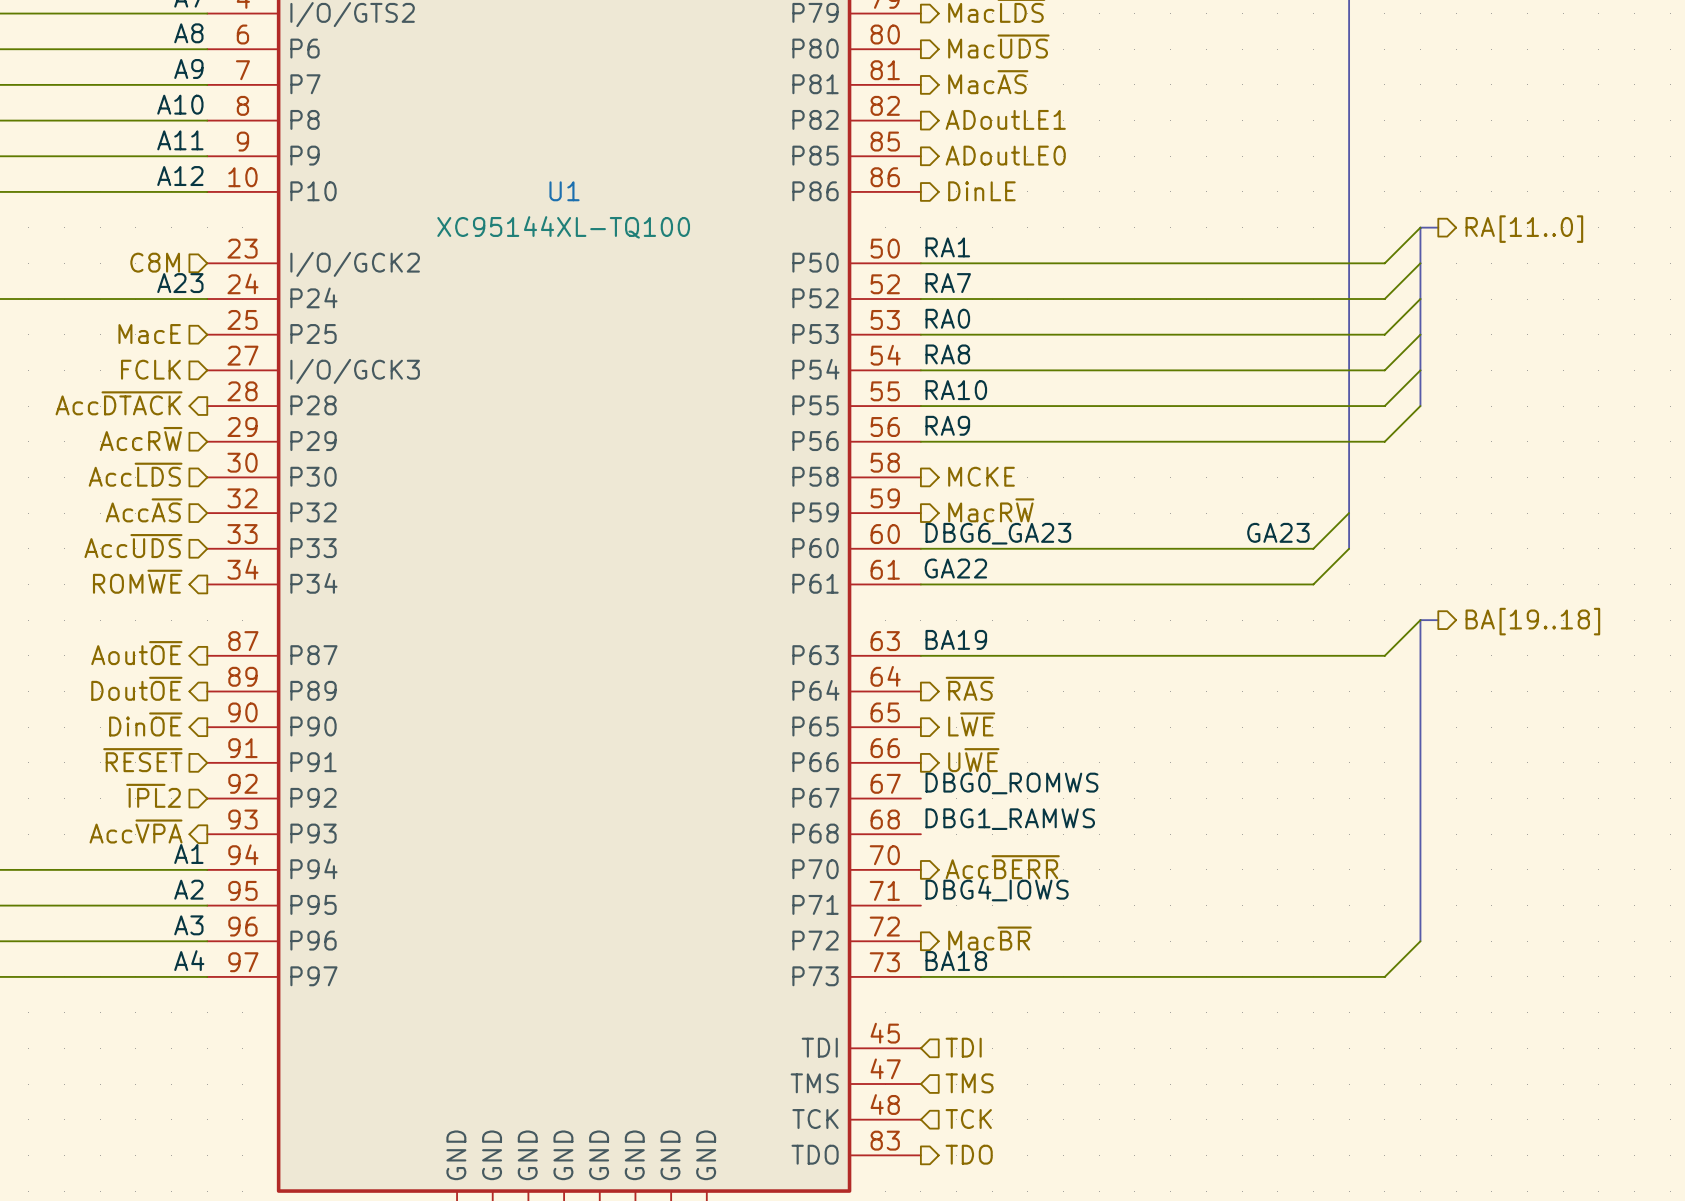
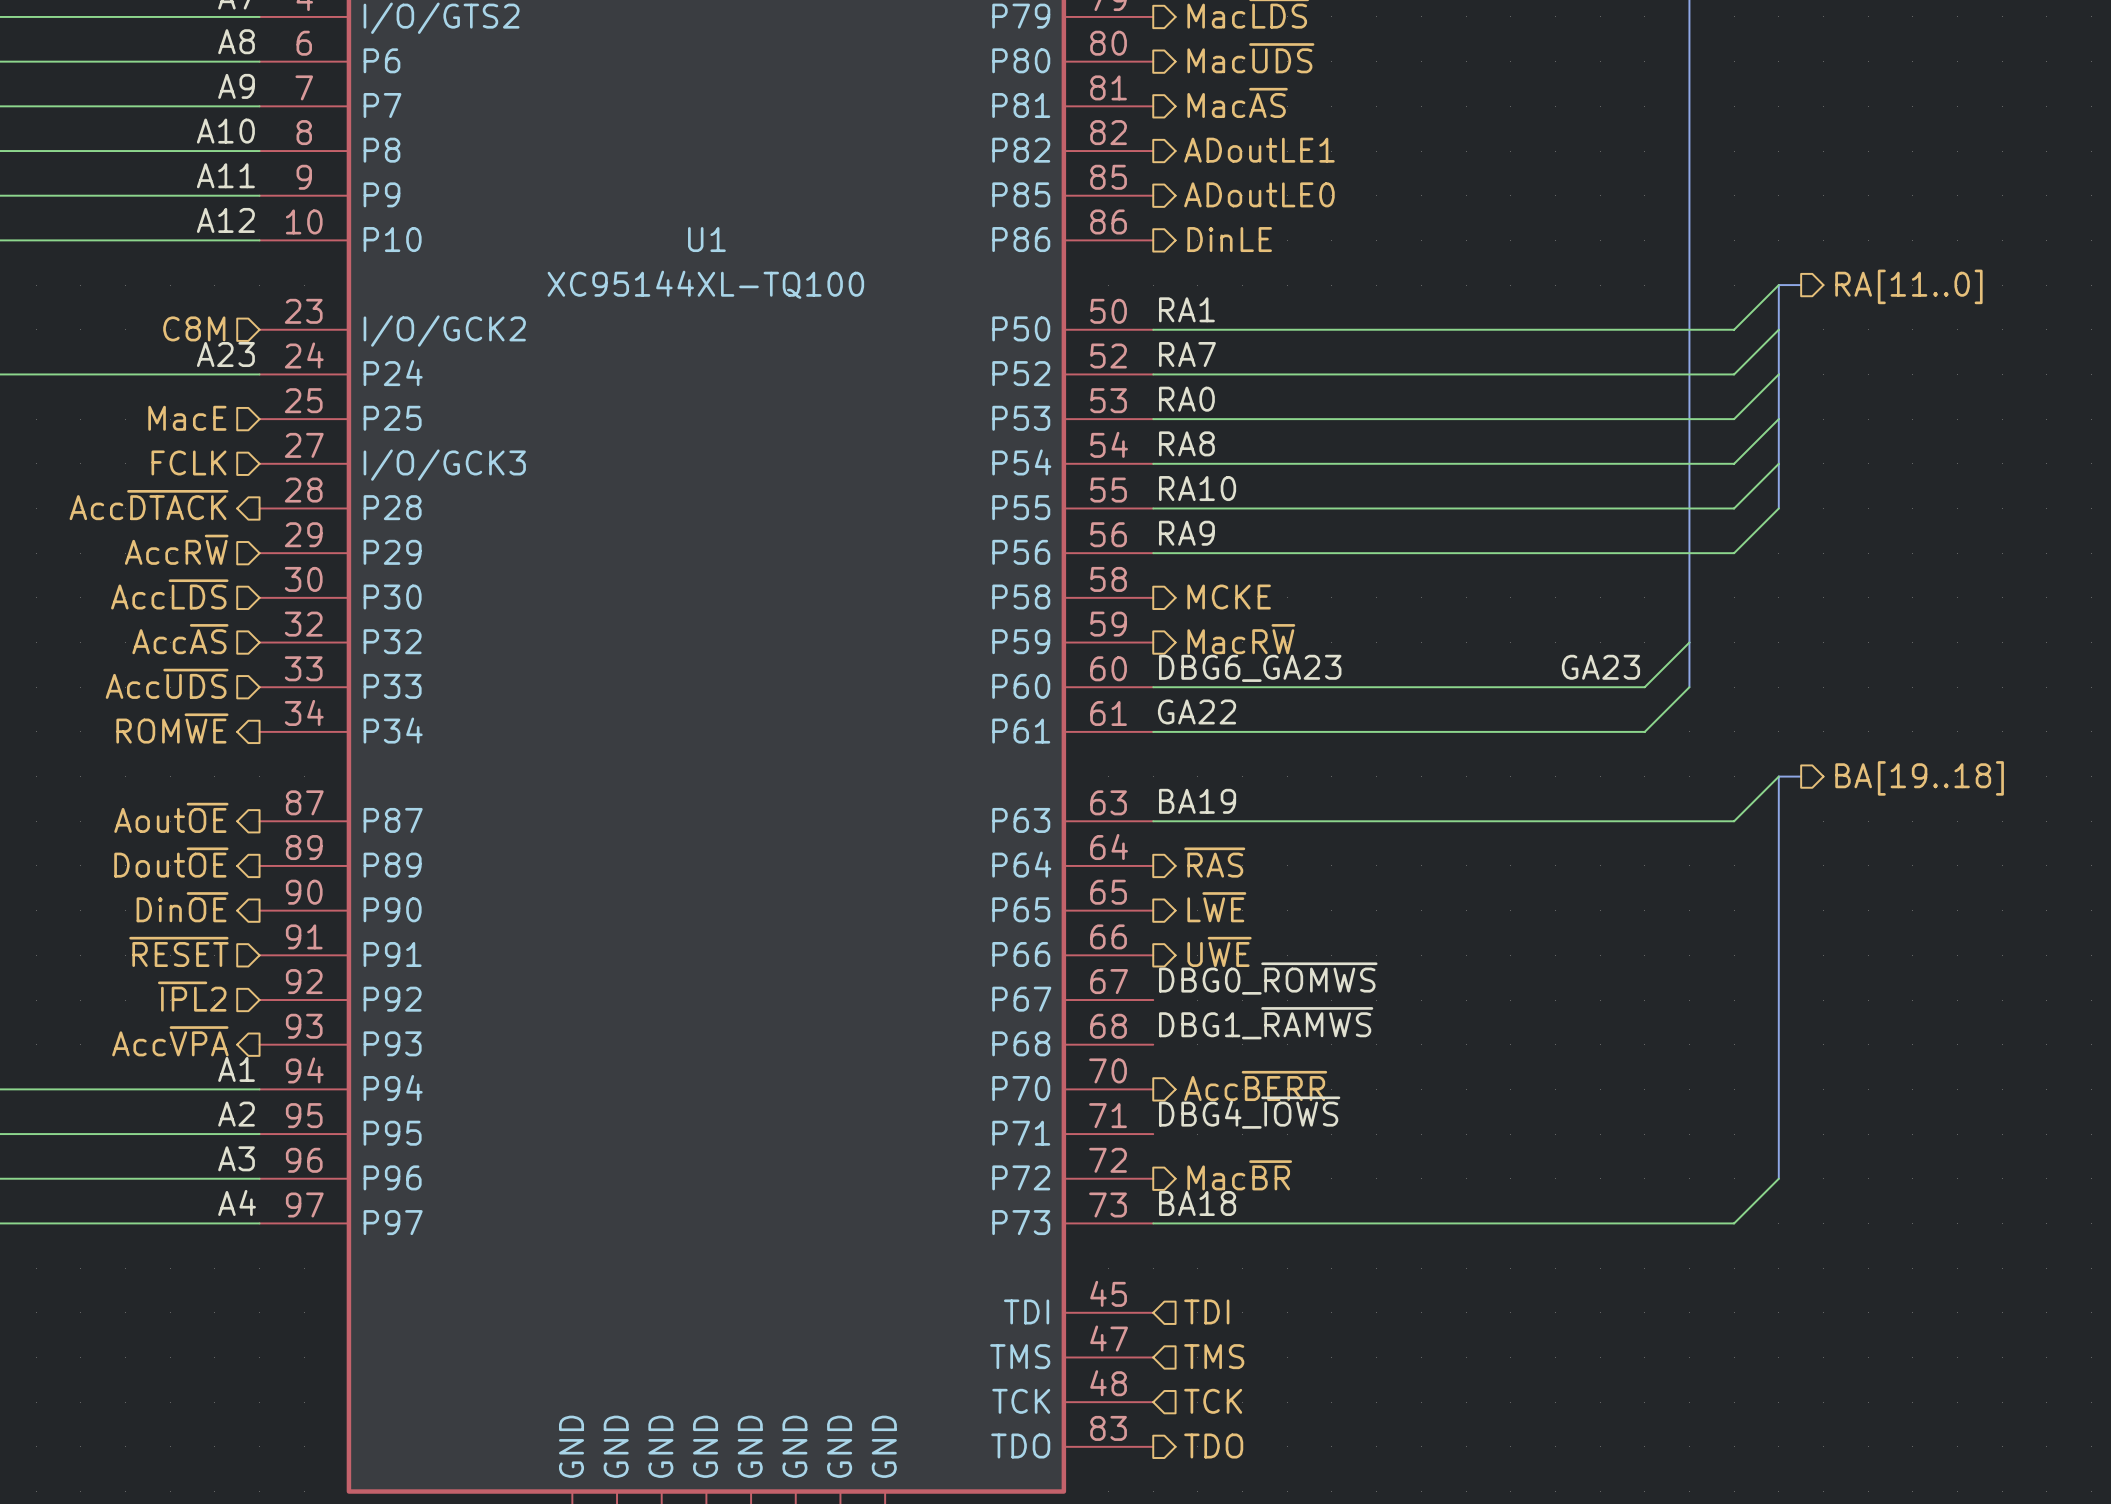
label: DBG0_ROMWS (1011, 783) -> DBG0_~{ROMWS} (1268, 978)
label: DBG1_RAMWS (1010, 819) -> DBG1_~{RAMWS} (1266, 1023)
label: DBG4_IOWS (997, 890) -> DBG4_~{IOWS} (1249, 1112)

